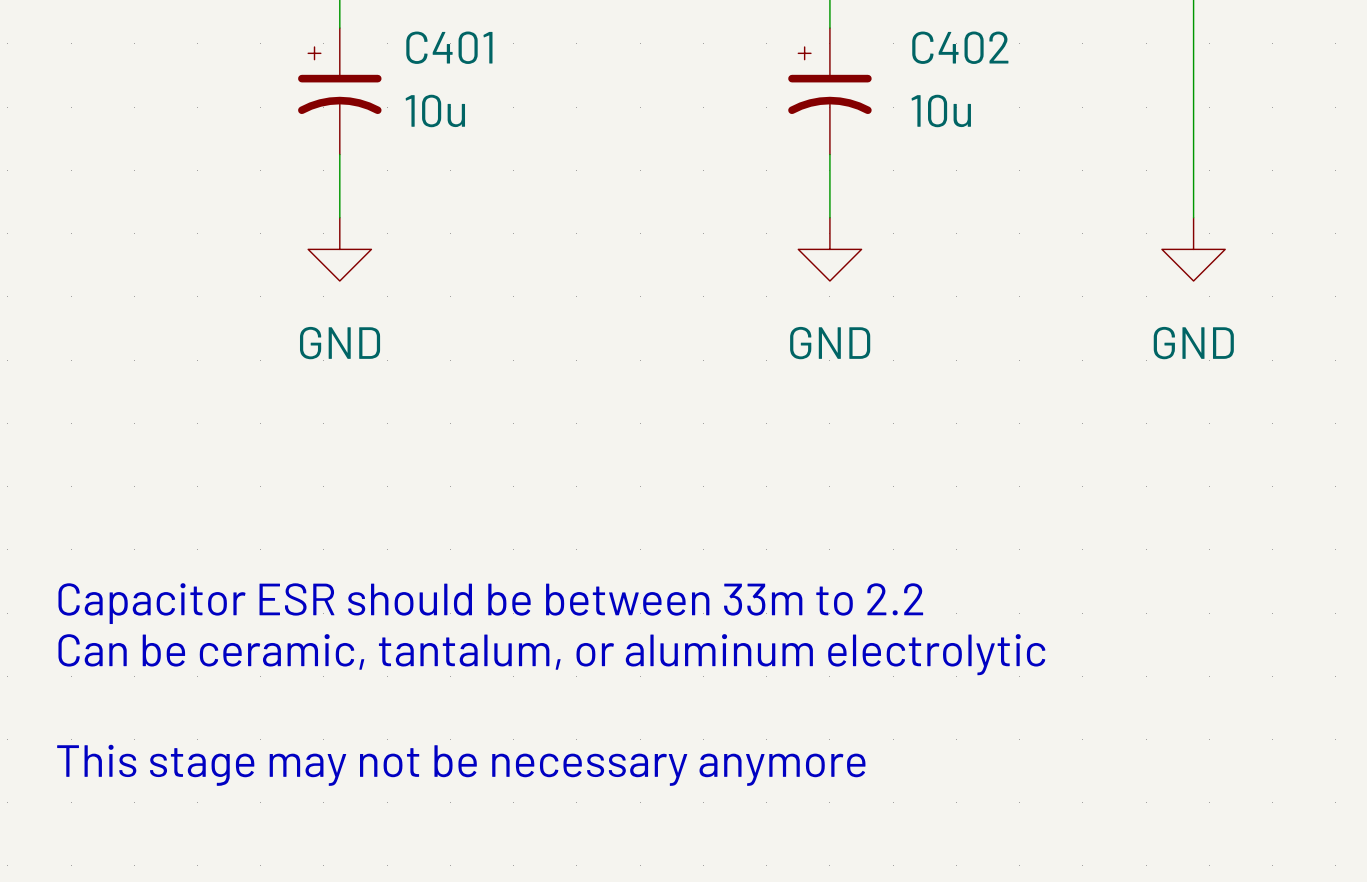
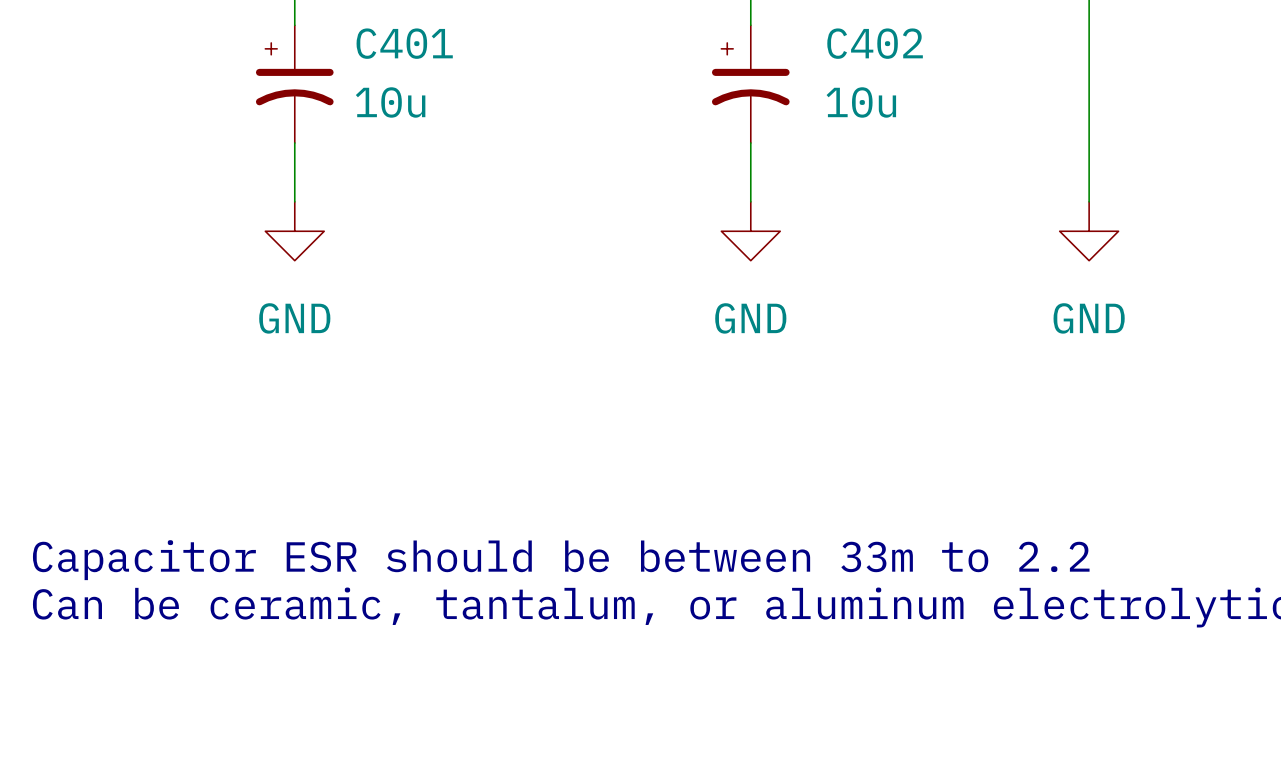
text: This stage may not be necessary anymore (461, 765) -> none

